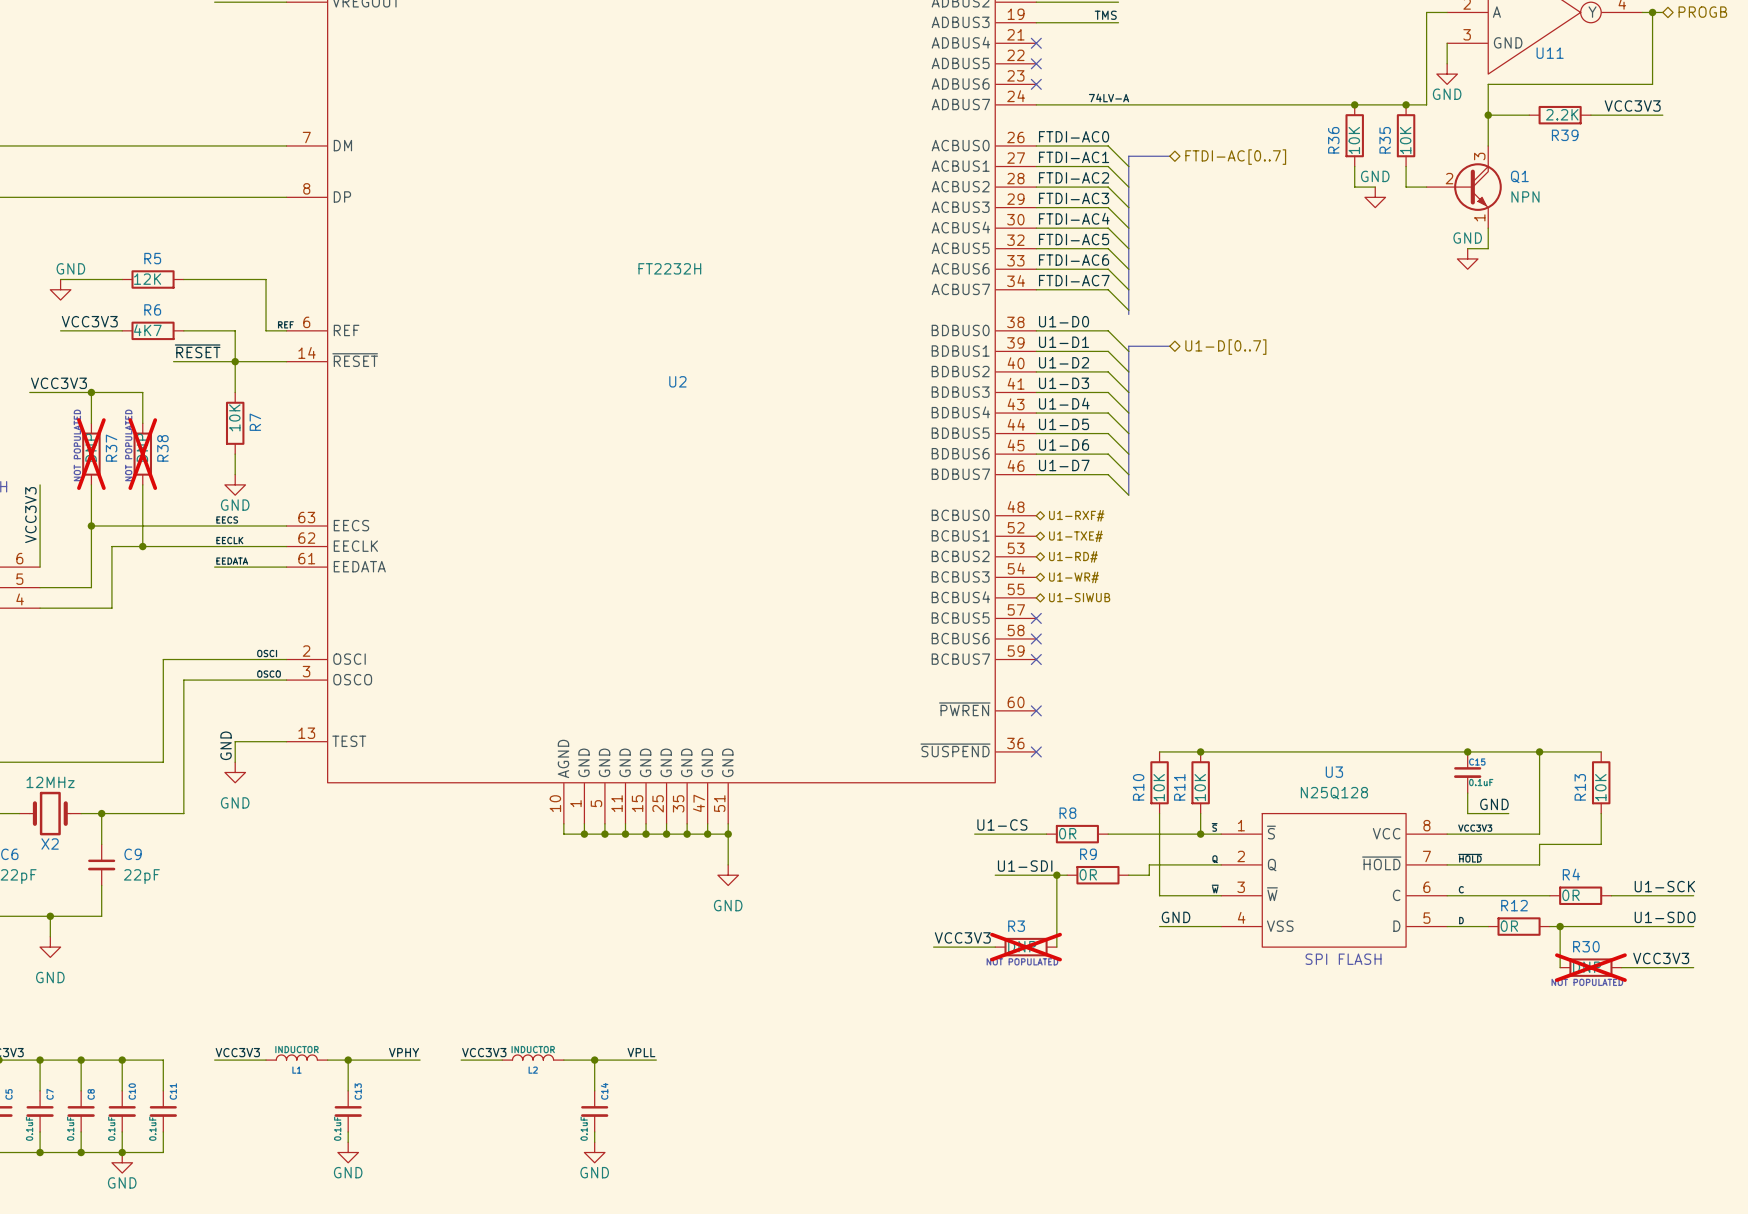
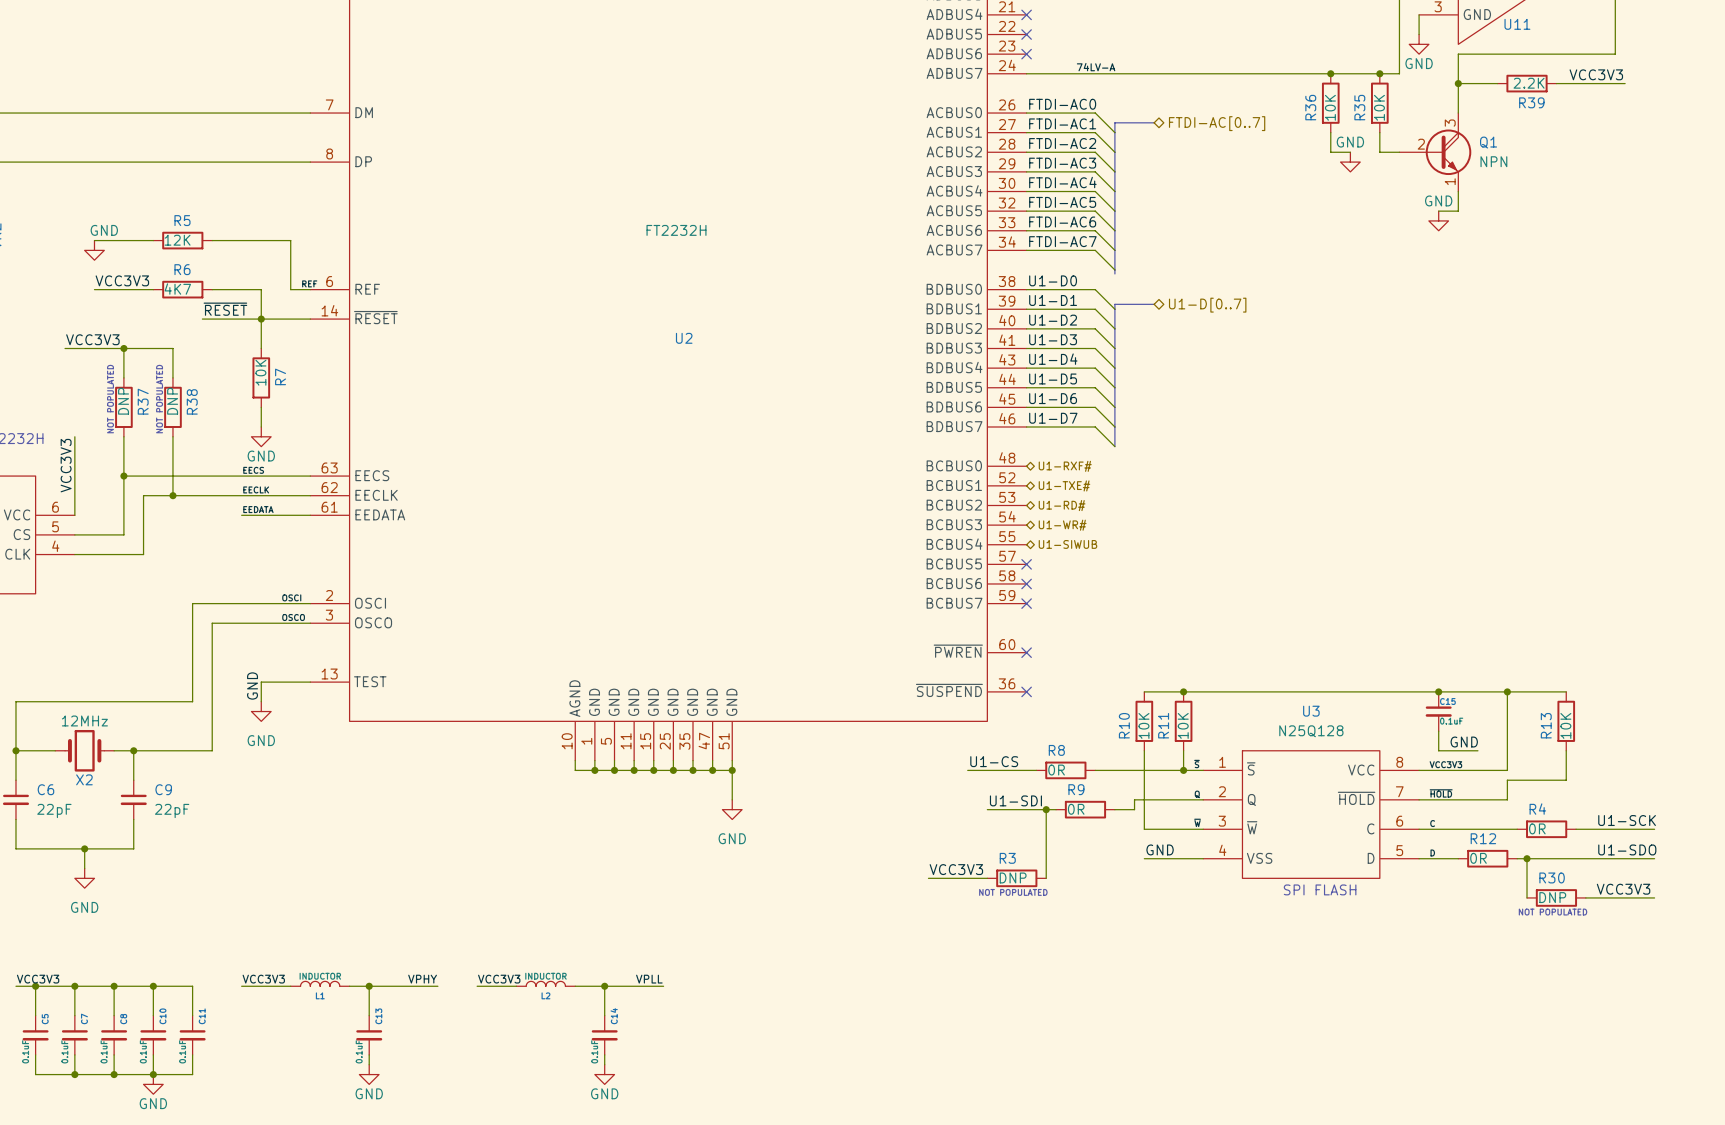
R37 do-not-place cross: (91, 454) -> none
R38 do-not-place cross: (142, 454) -> none
R3 do-not-place cross: (1026, 947) -> none
R30 do-not-place cross: (1590, 967) -> none

